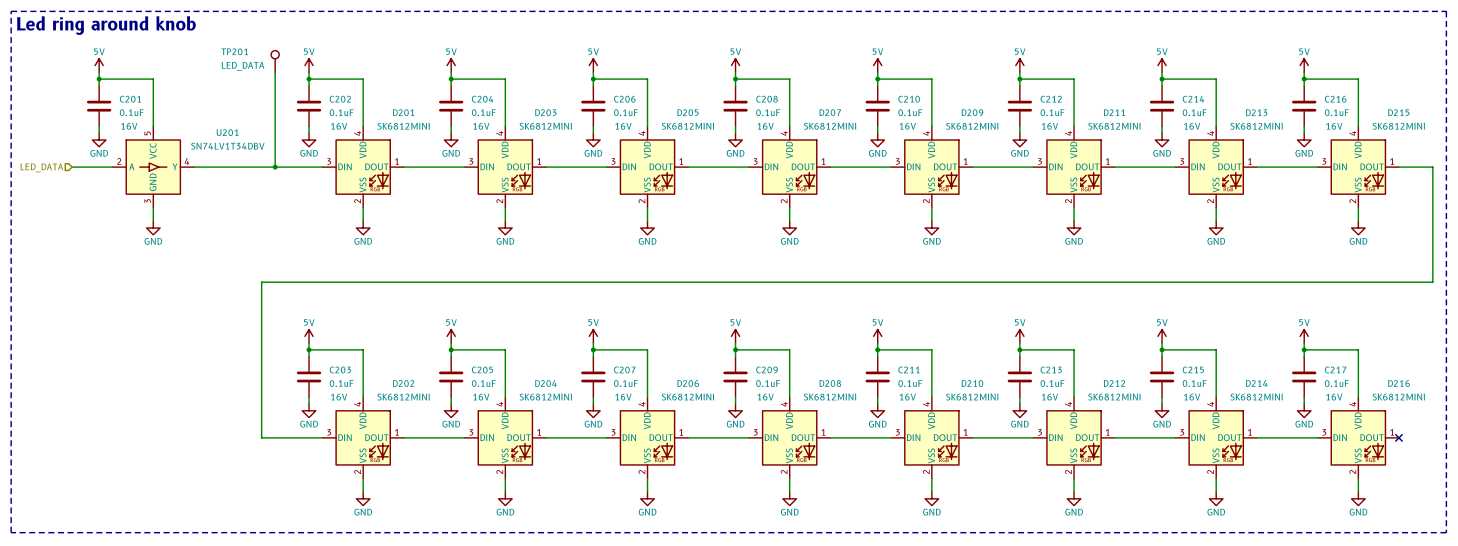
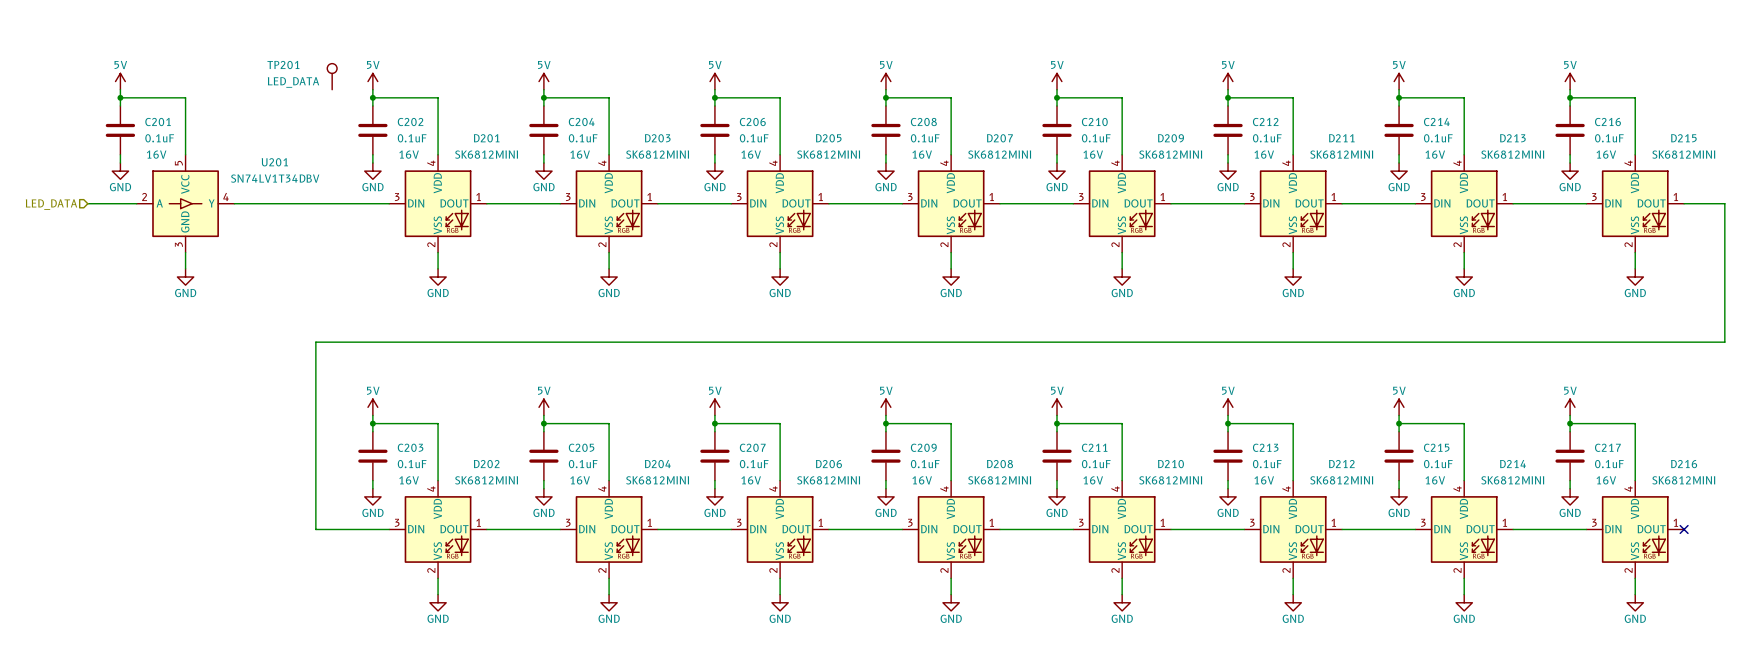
line: (11, 11) (1446, 11) (1446, 532) (11, 532) (11, 11) -> none
text: Led ring around knob (106, 25) -> none
wire: (275, 72) (275, 167) -> none
junction: (275, 167) -> none

